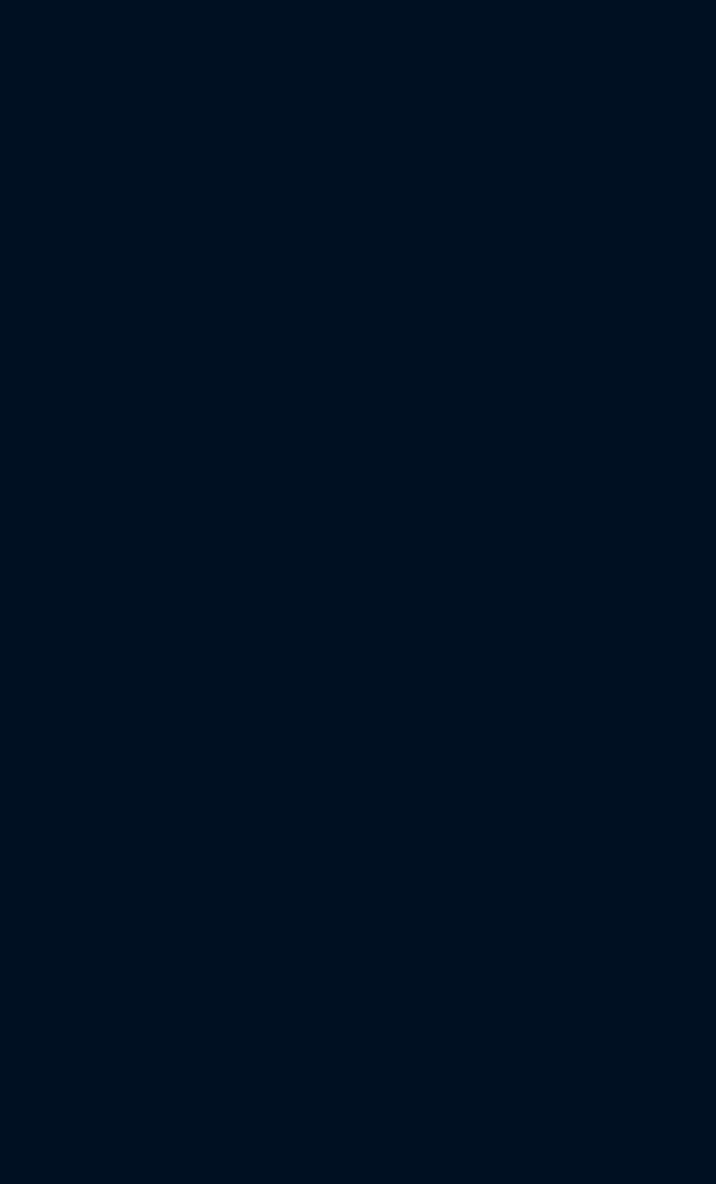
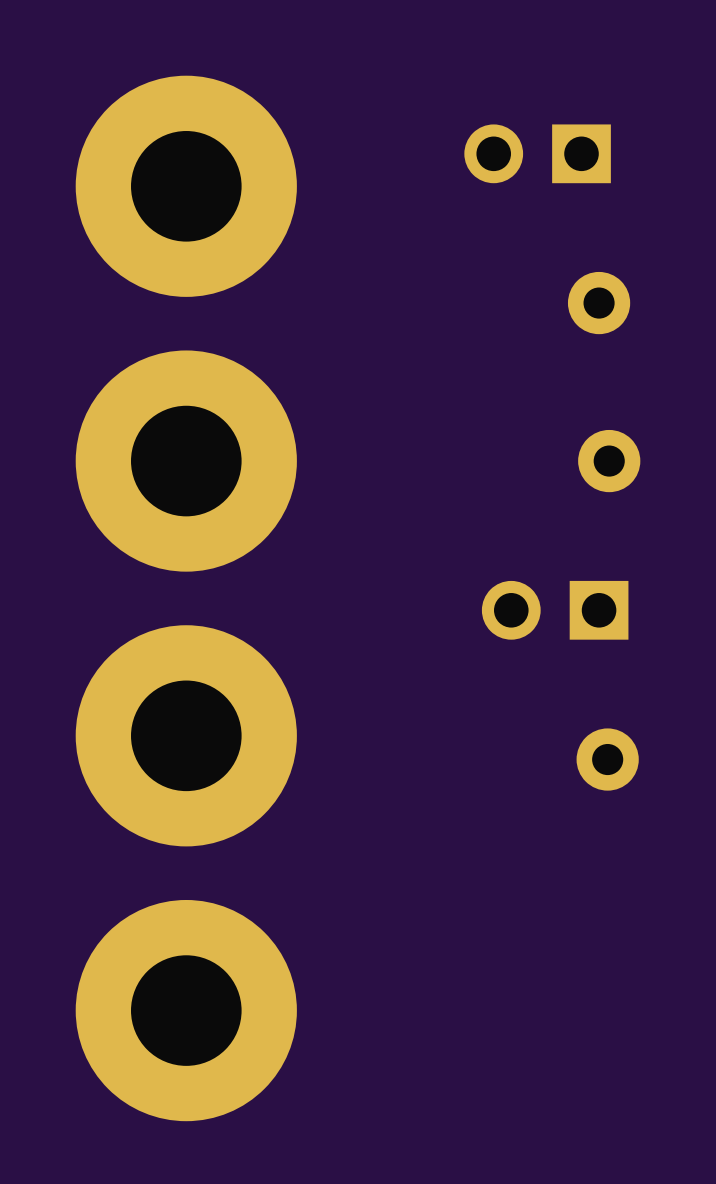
part: none -> (537, 153)
part: none -> (186, 186)
part: none -> (599, 303)
part: none -> (186, 461)
part: none -> (609, 461)
part: none -> (555, 610)
part: none -> (186, 735)
part: none -> (607, 759)
part: none -> (186, 1010)

